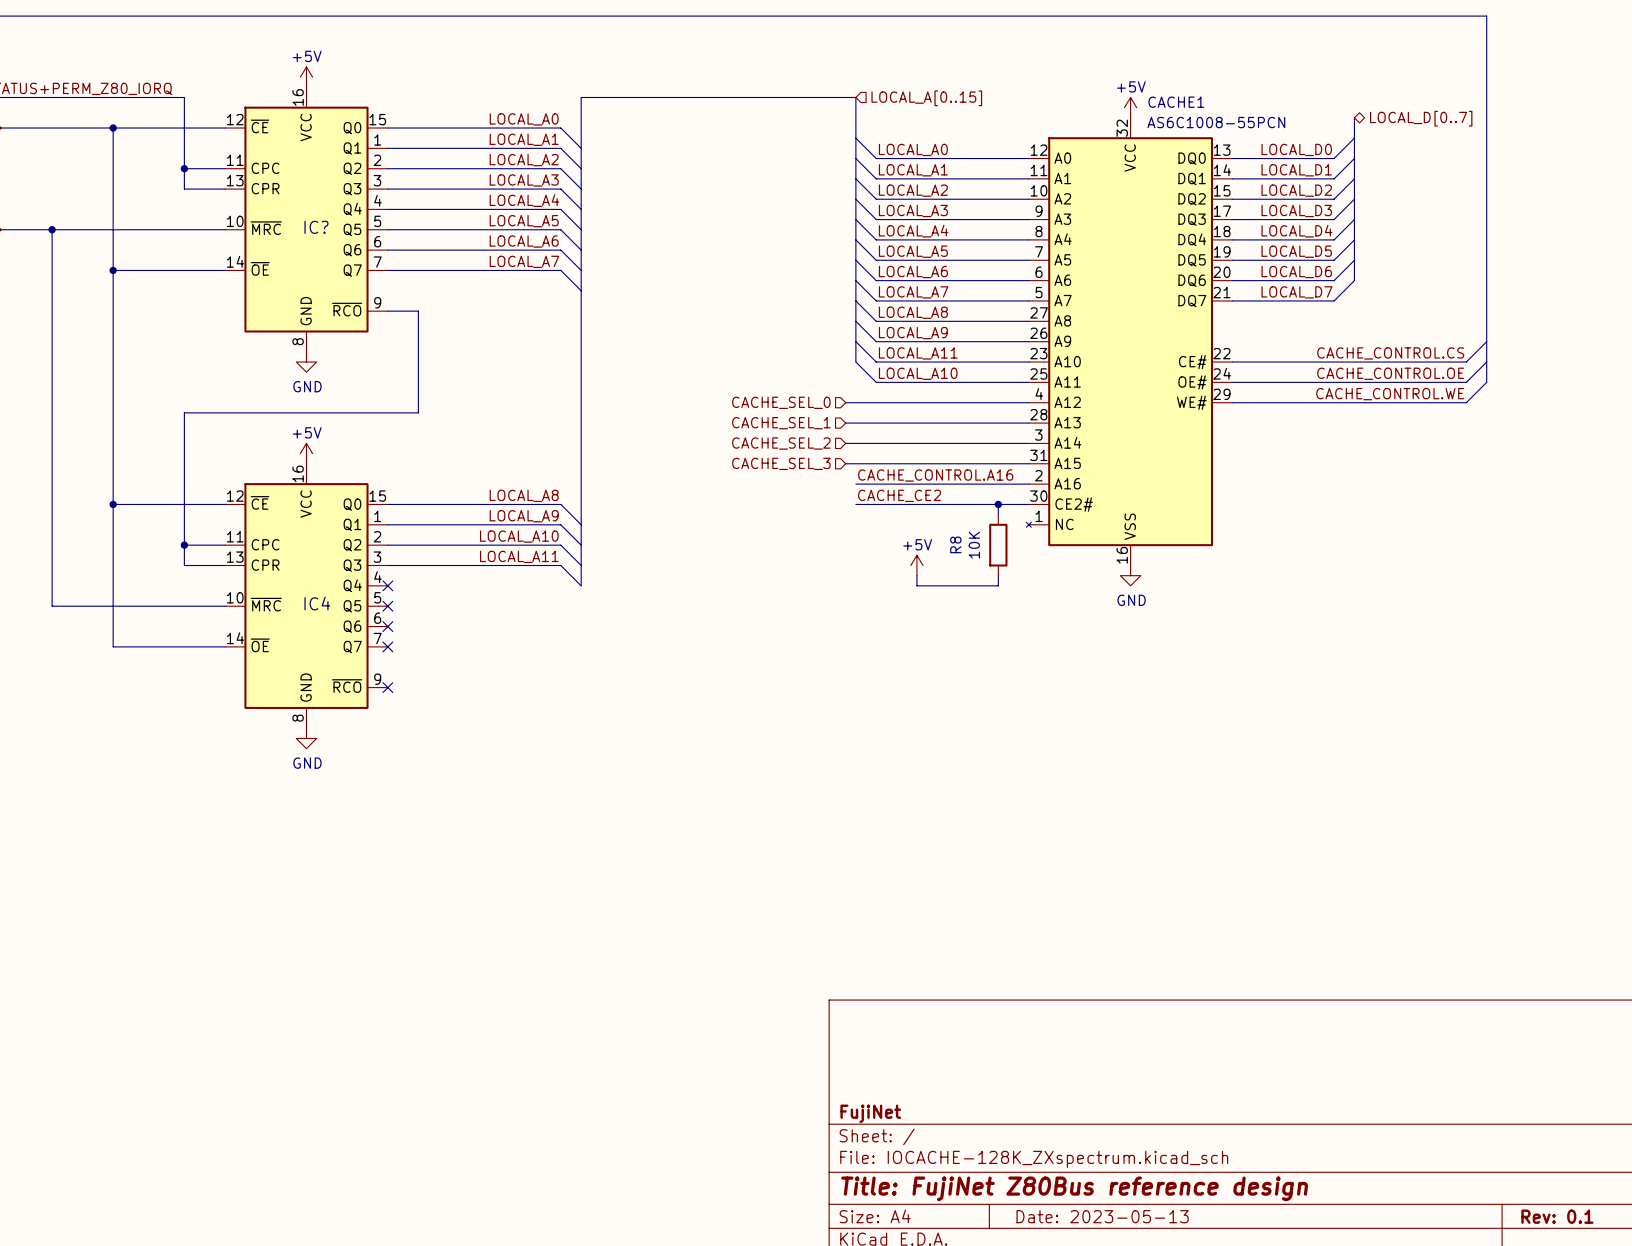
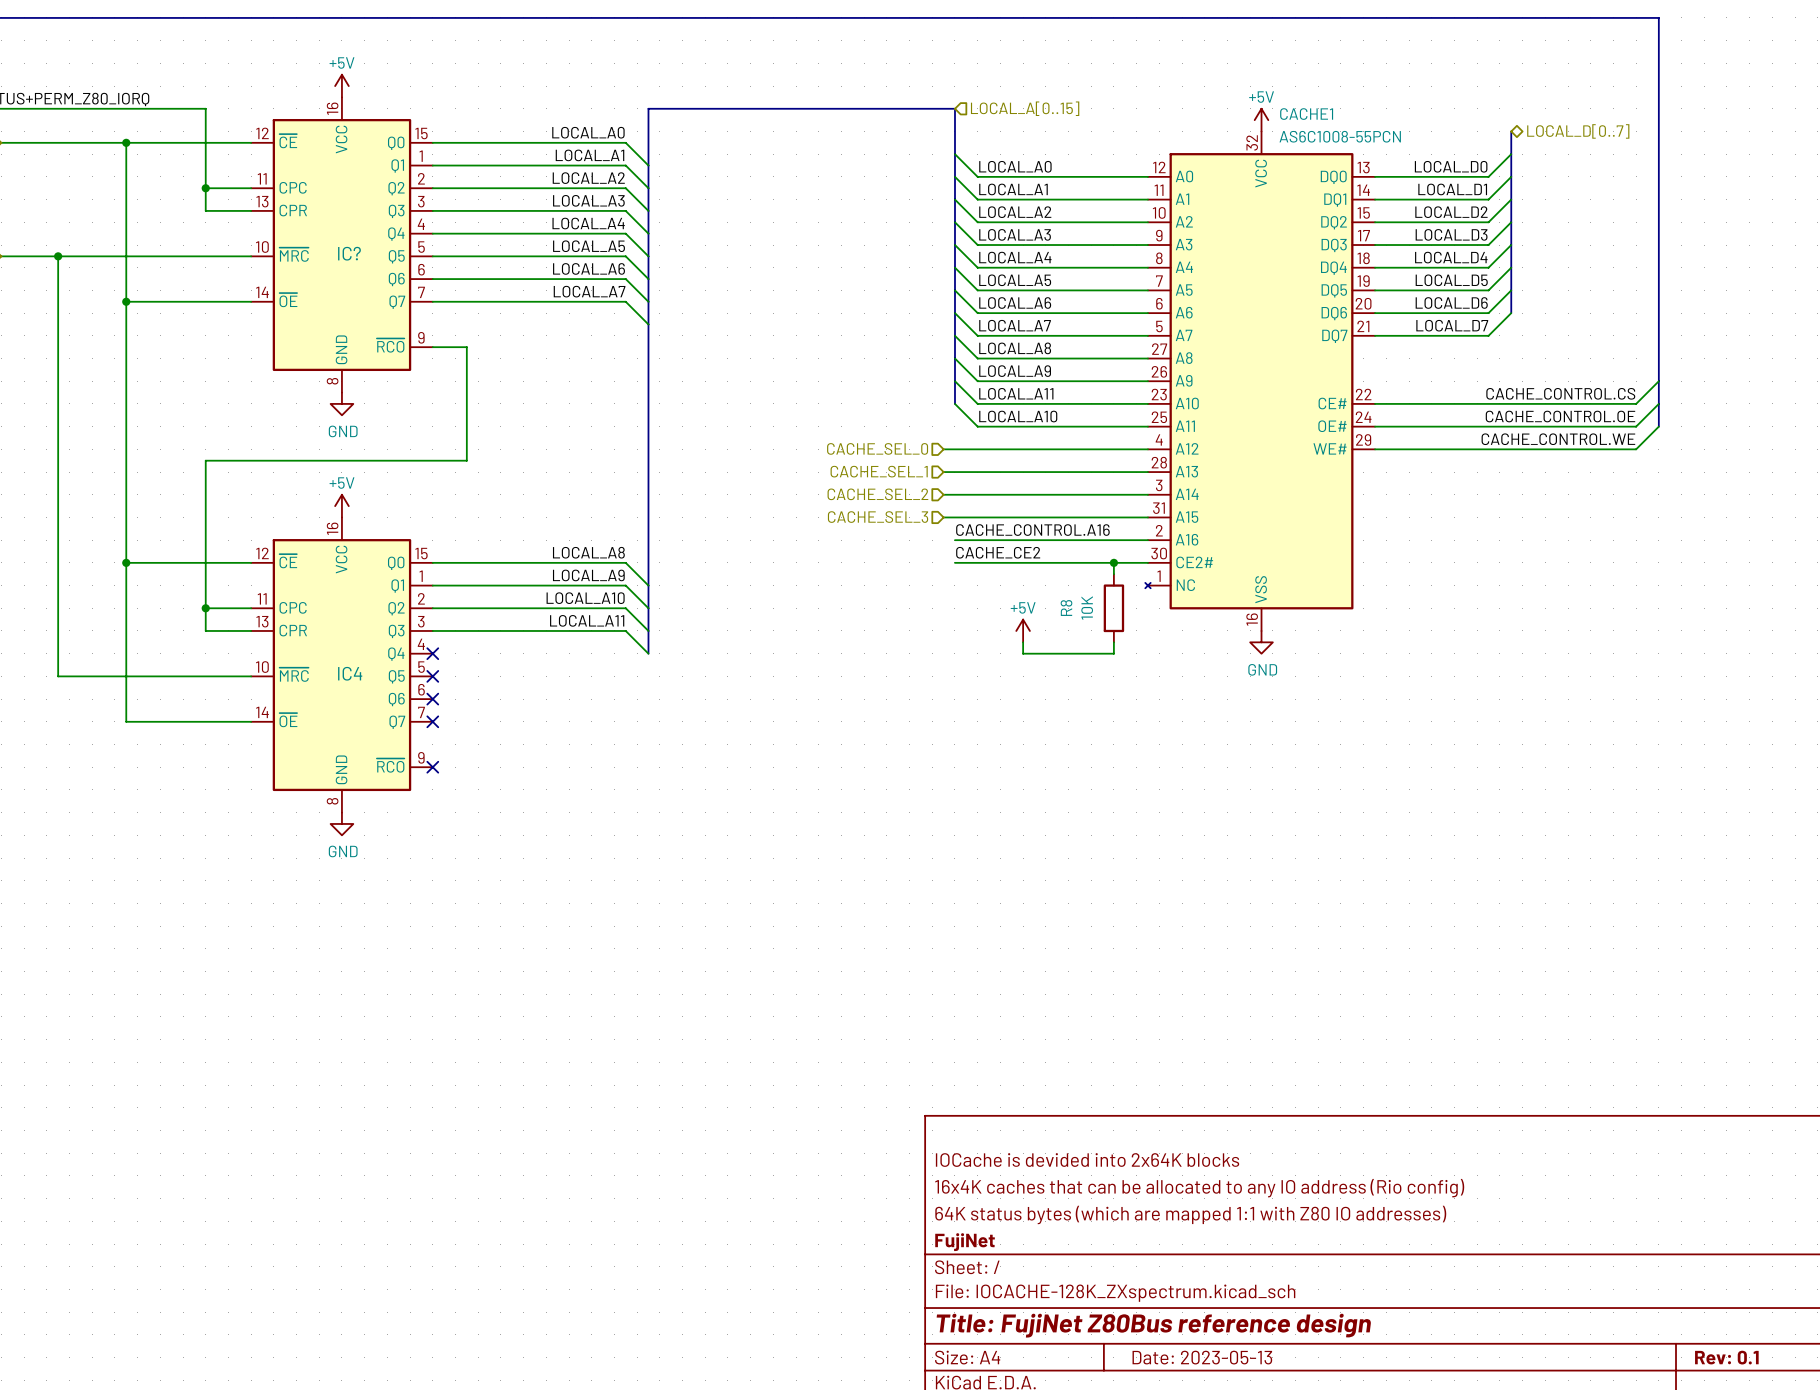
title block: none -> IOCache is devided into 2x64K blocks (1087, 1160)
title block: none -> 16x4K caches that can be allocated to any IO address (Rio config) (1199, 1188)
title block: none -> 64K status bytes (which are mapped 1:1 with Z80 IO addresses) (1190, 1214)

